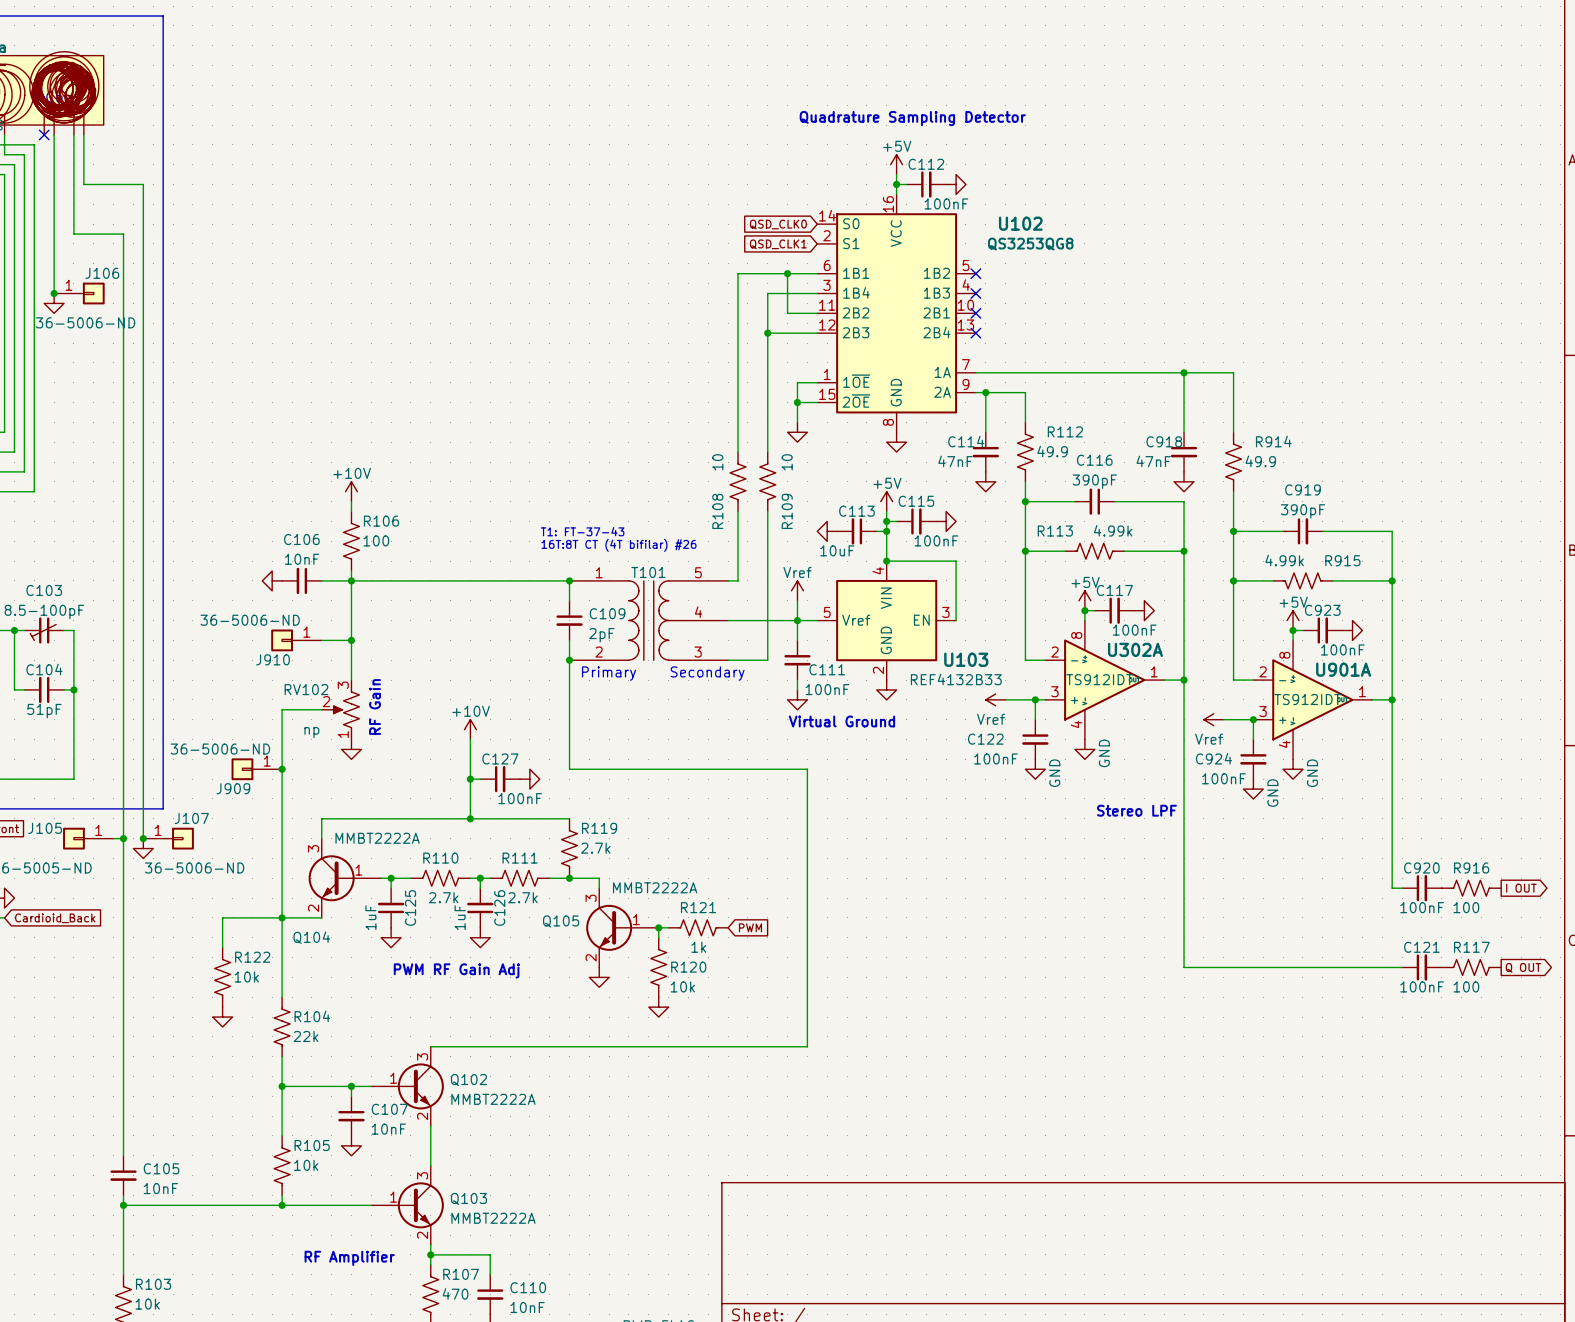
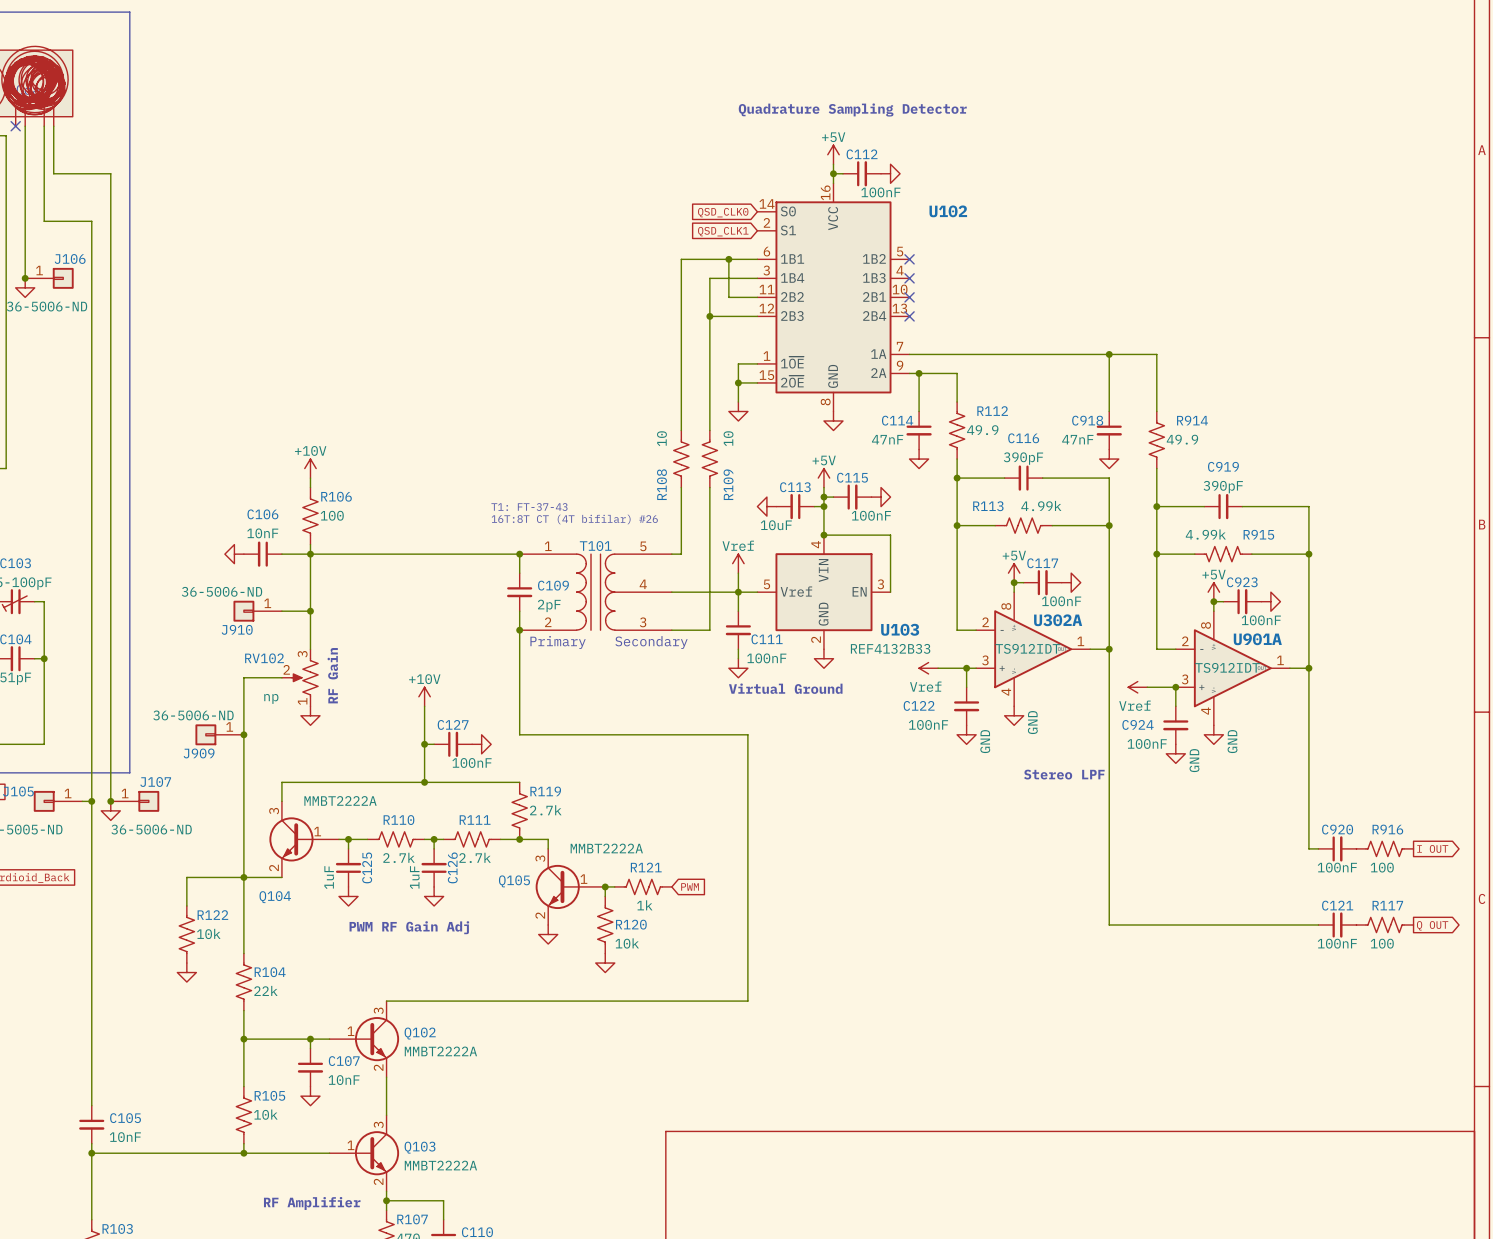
U102 value: QS3253QG8 (1030, 244) -> none

